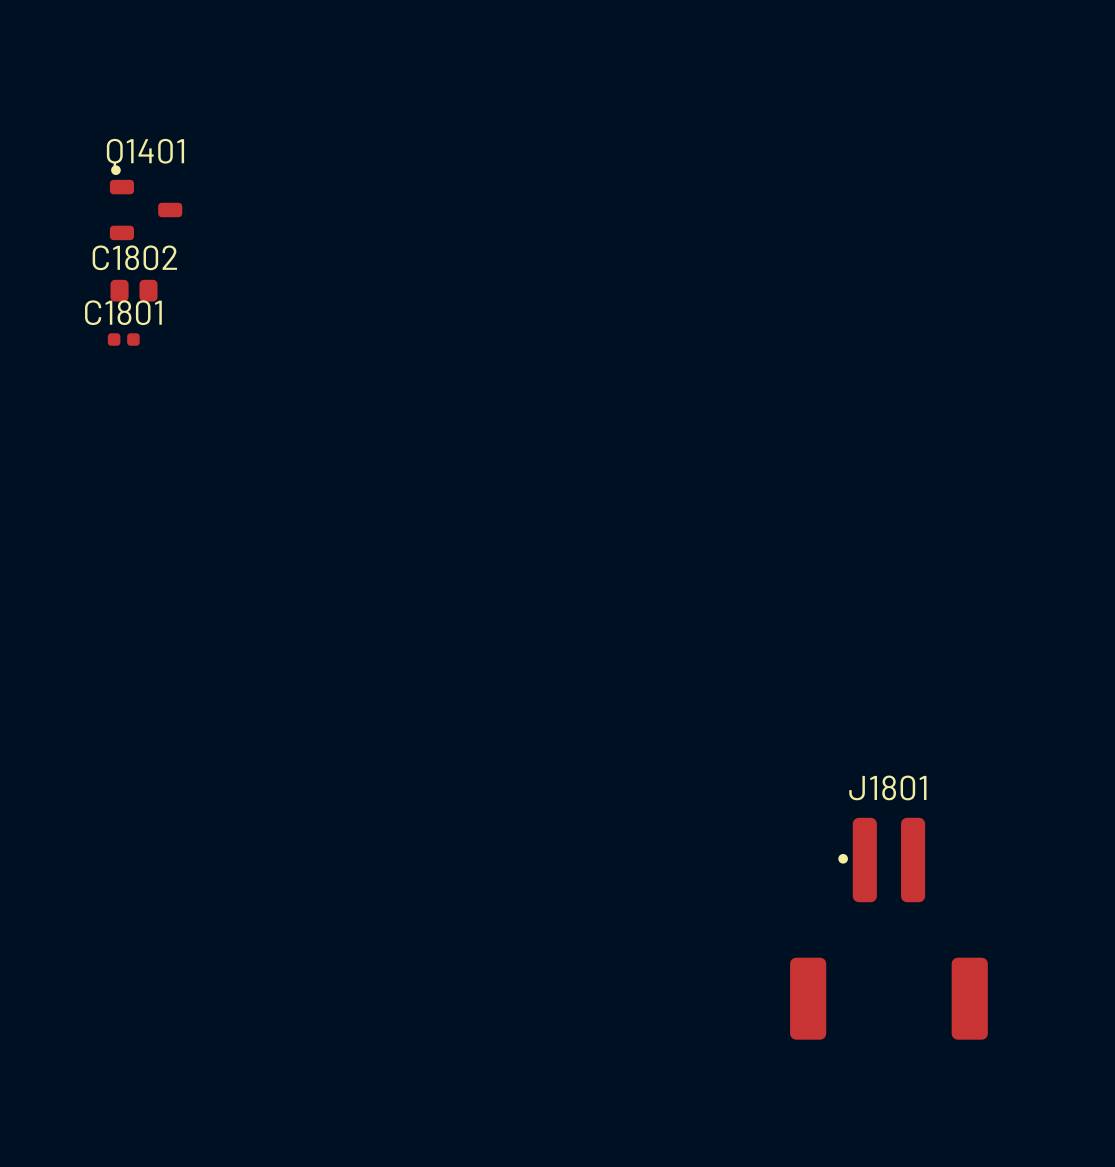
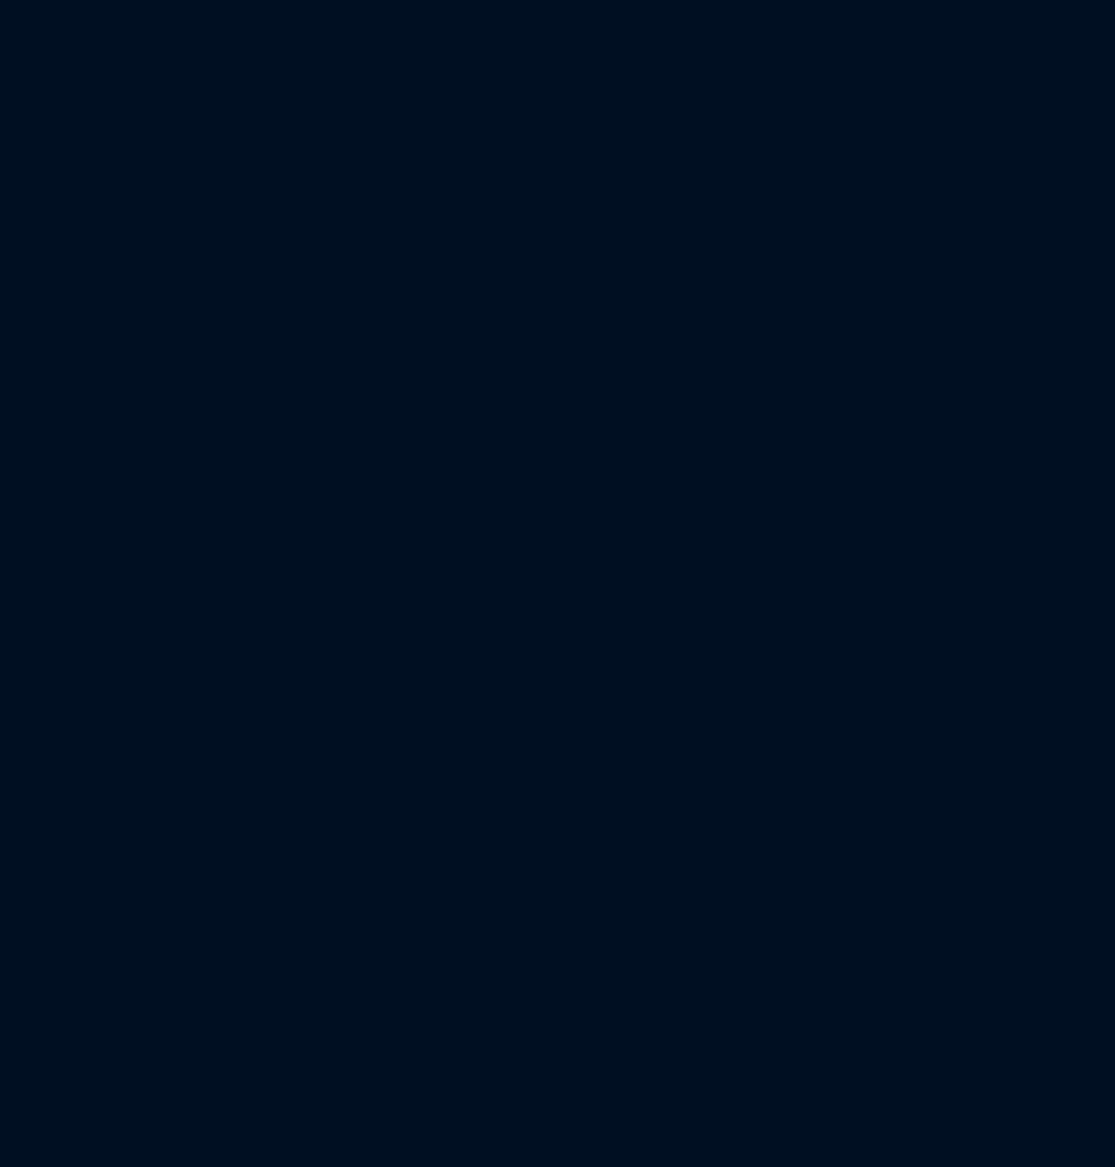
Q1401: (146, 202) -> none
C1802: (134, 290) -> none
C1801: (123, 339) -> none
J1801: (888, 928) -> none

